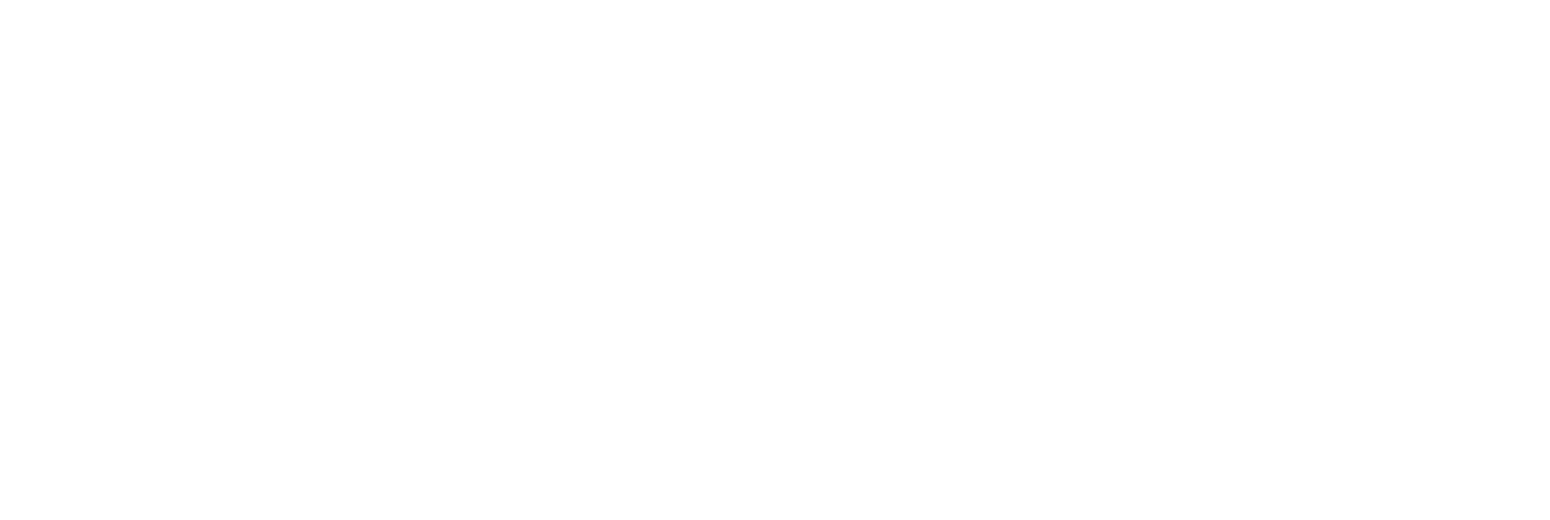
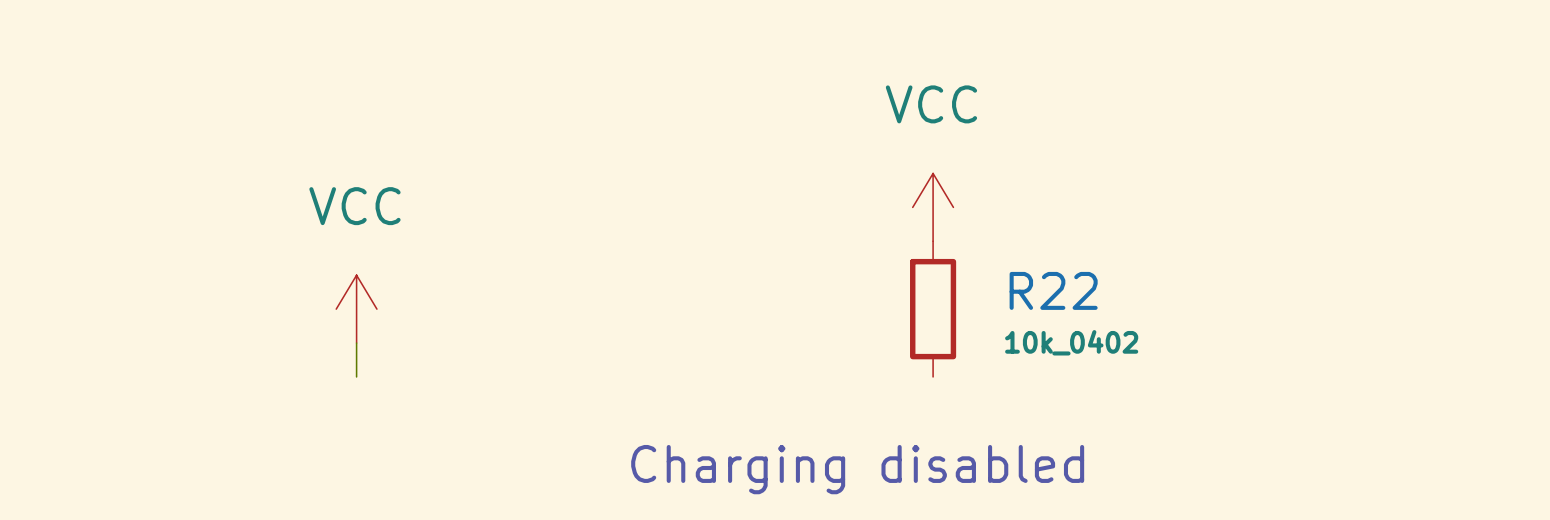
power symbol: none -> VCC (933, 207)
power symbol: none -> VCC (356, 309)
R22: none -> 10k_0402 (933, 309)
wire: none -> (356, 343) (356, 376)
text: none -> Charging disabled (857, 469)

